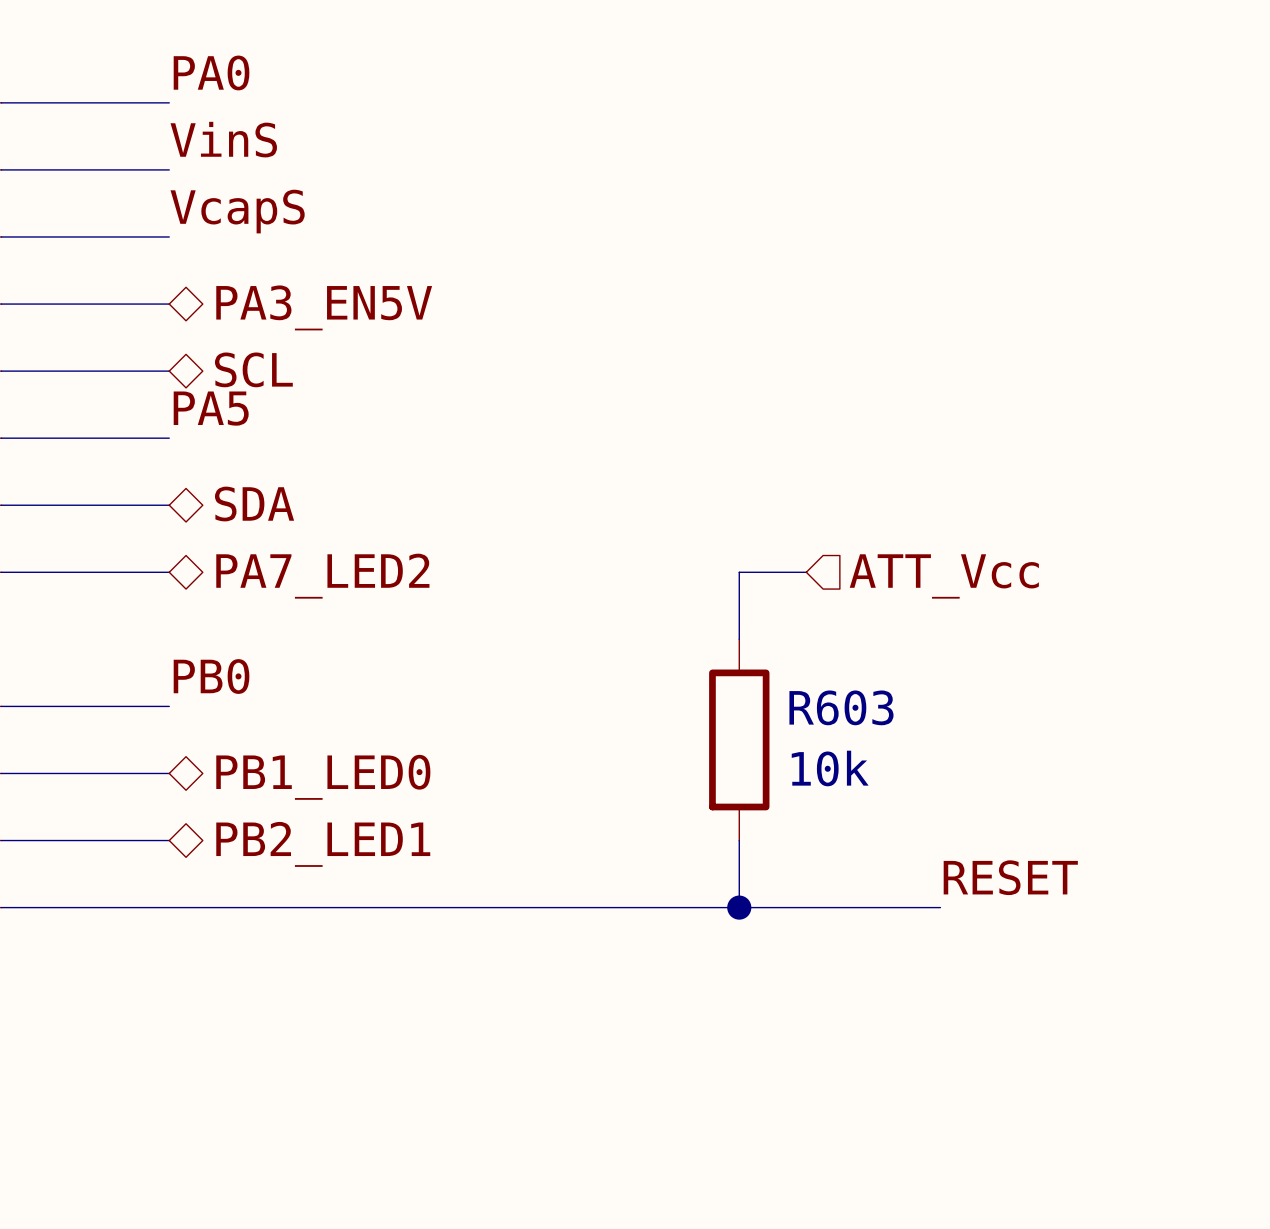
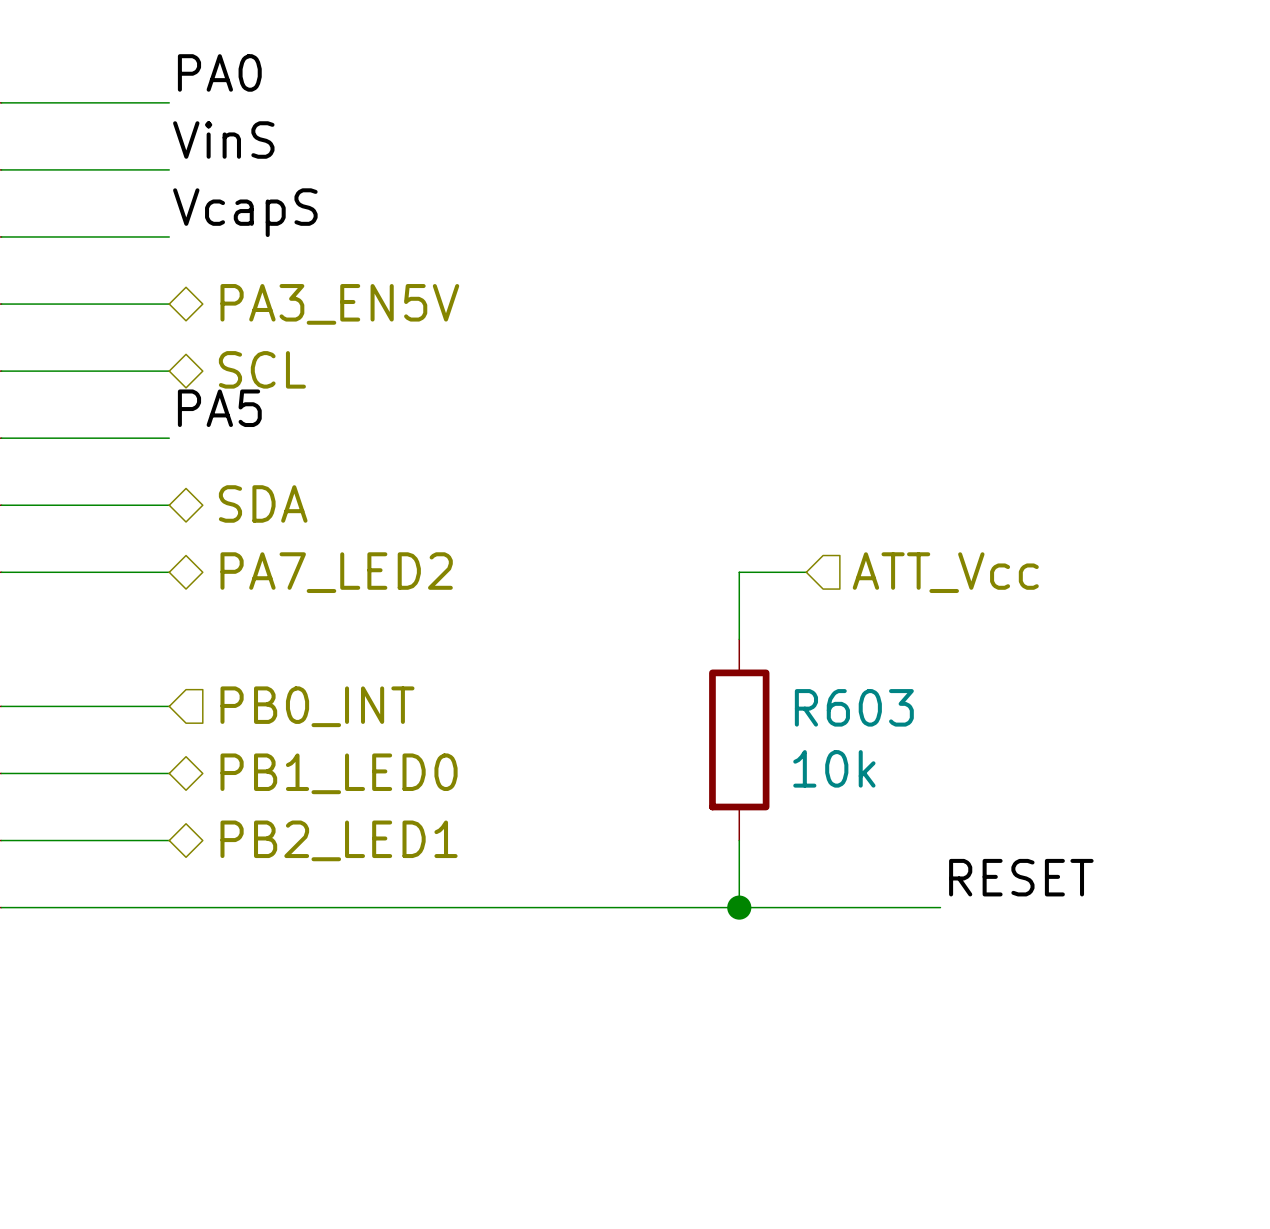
label: PB0 (211, 676) -> none
hierarchical label: none -> PB0_INT (317, 706)

